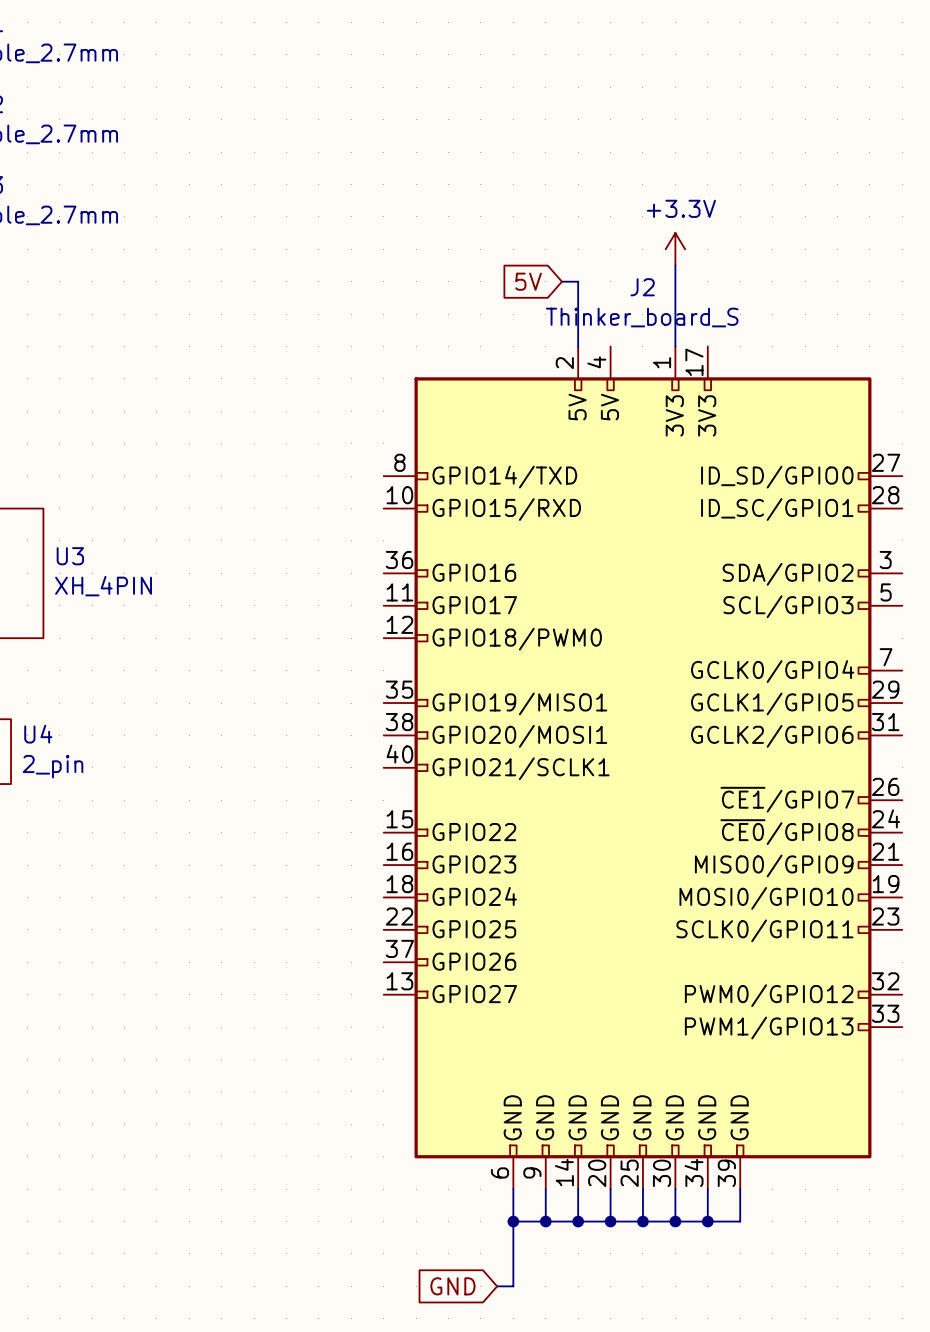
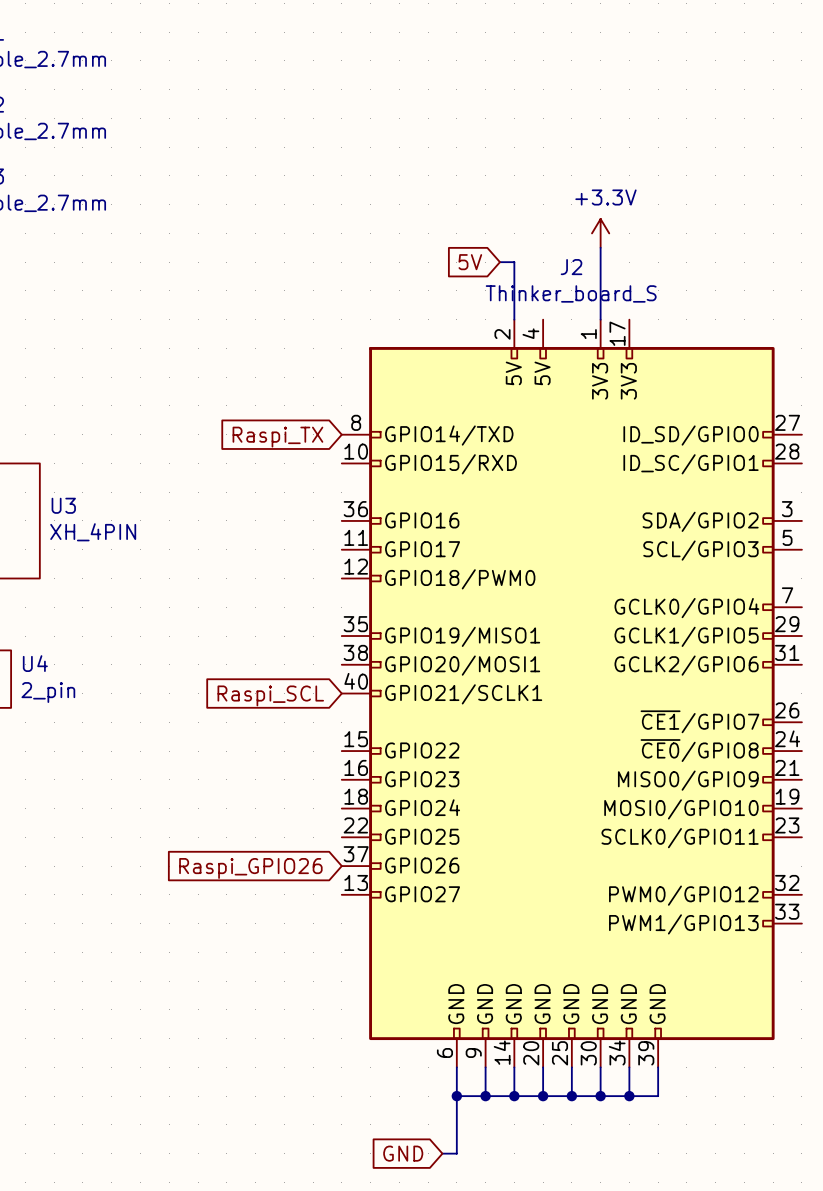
global label: none -> Raspi_TX (277, 437)
global label: none -> Raspi_SCL (270, 695)
global label: none -> Raspi_GPIO26 (250, 868)

